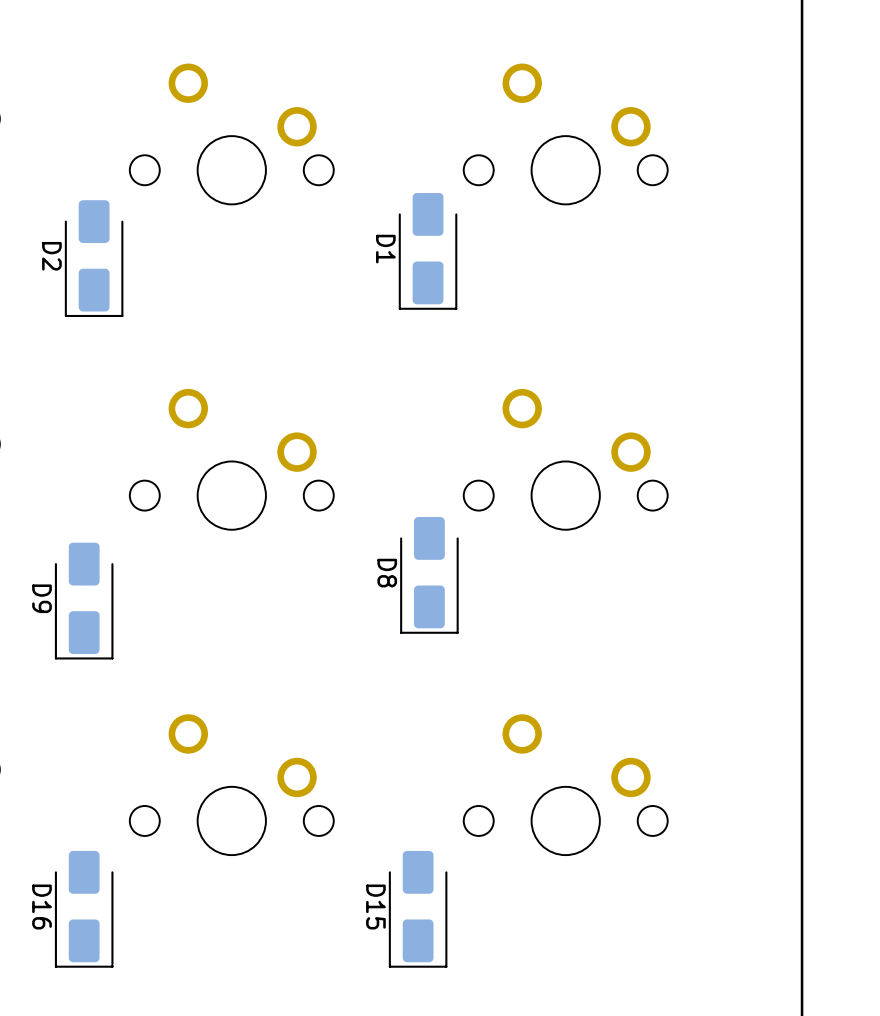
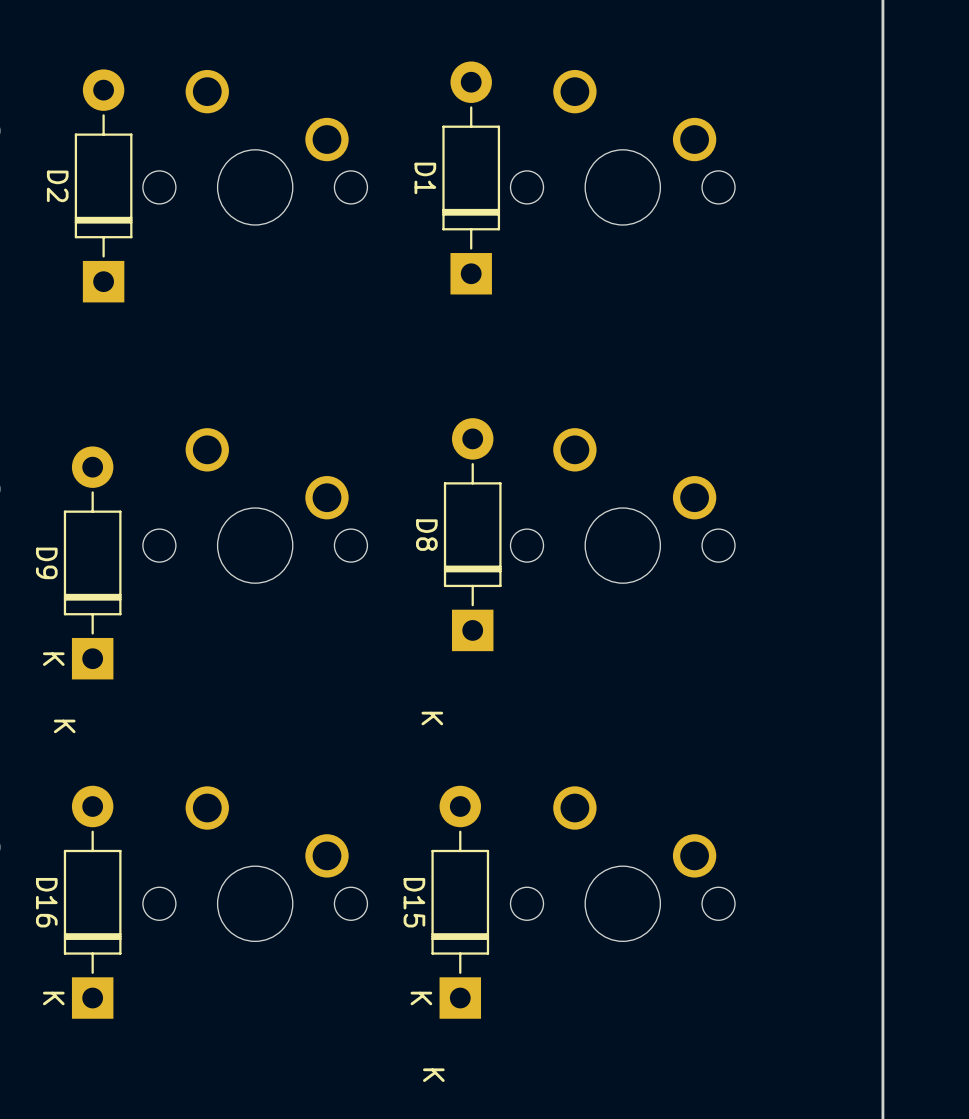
D1 footprint: [398, 193, 458, 310] -> [442, 61, 501, 295]
D2 footprint: [64, 200, 124, 318] -> [74, 69, 133, 303]
D8 footprint: [400, 517, 459, 634] -> [443, 418, 502, 652]
D9 footprint: [54, 542, 114, 660] -> [63, 446, 122, 680]
D16 footprint: [54, 850, 114, 968] -> [63, 785, 122, 1019]
D15 footprint: [388, 850, 448, 968] -> [431, 785, 490, 1019]

